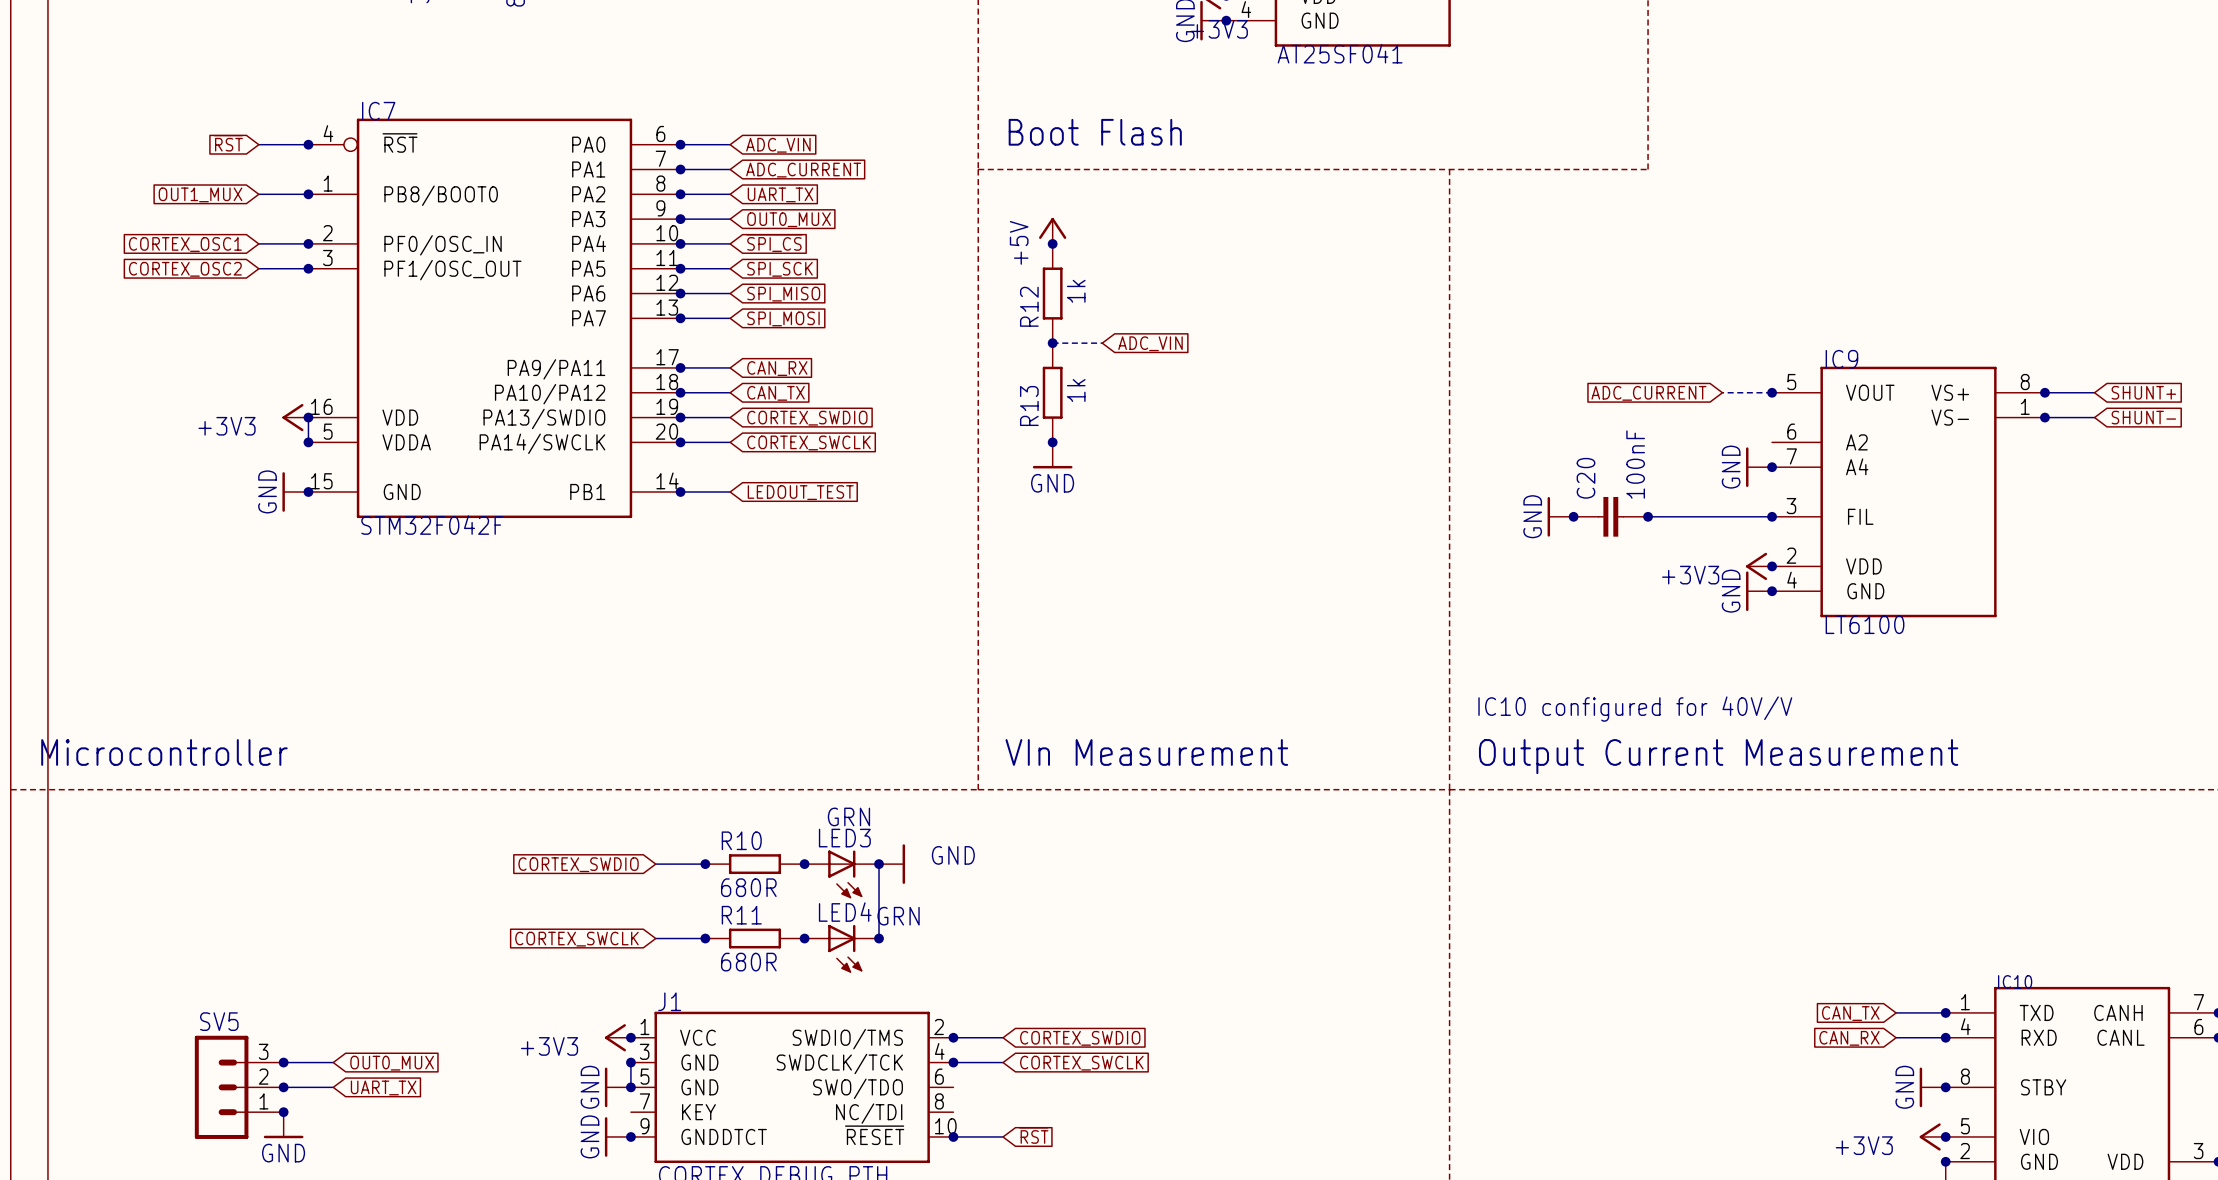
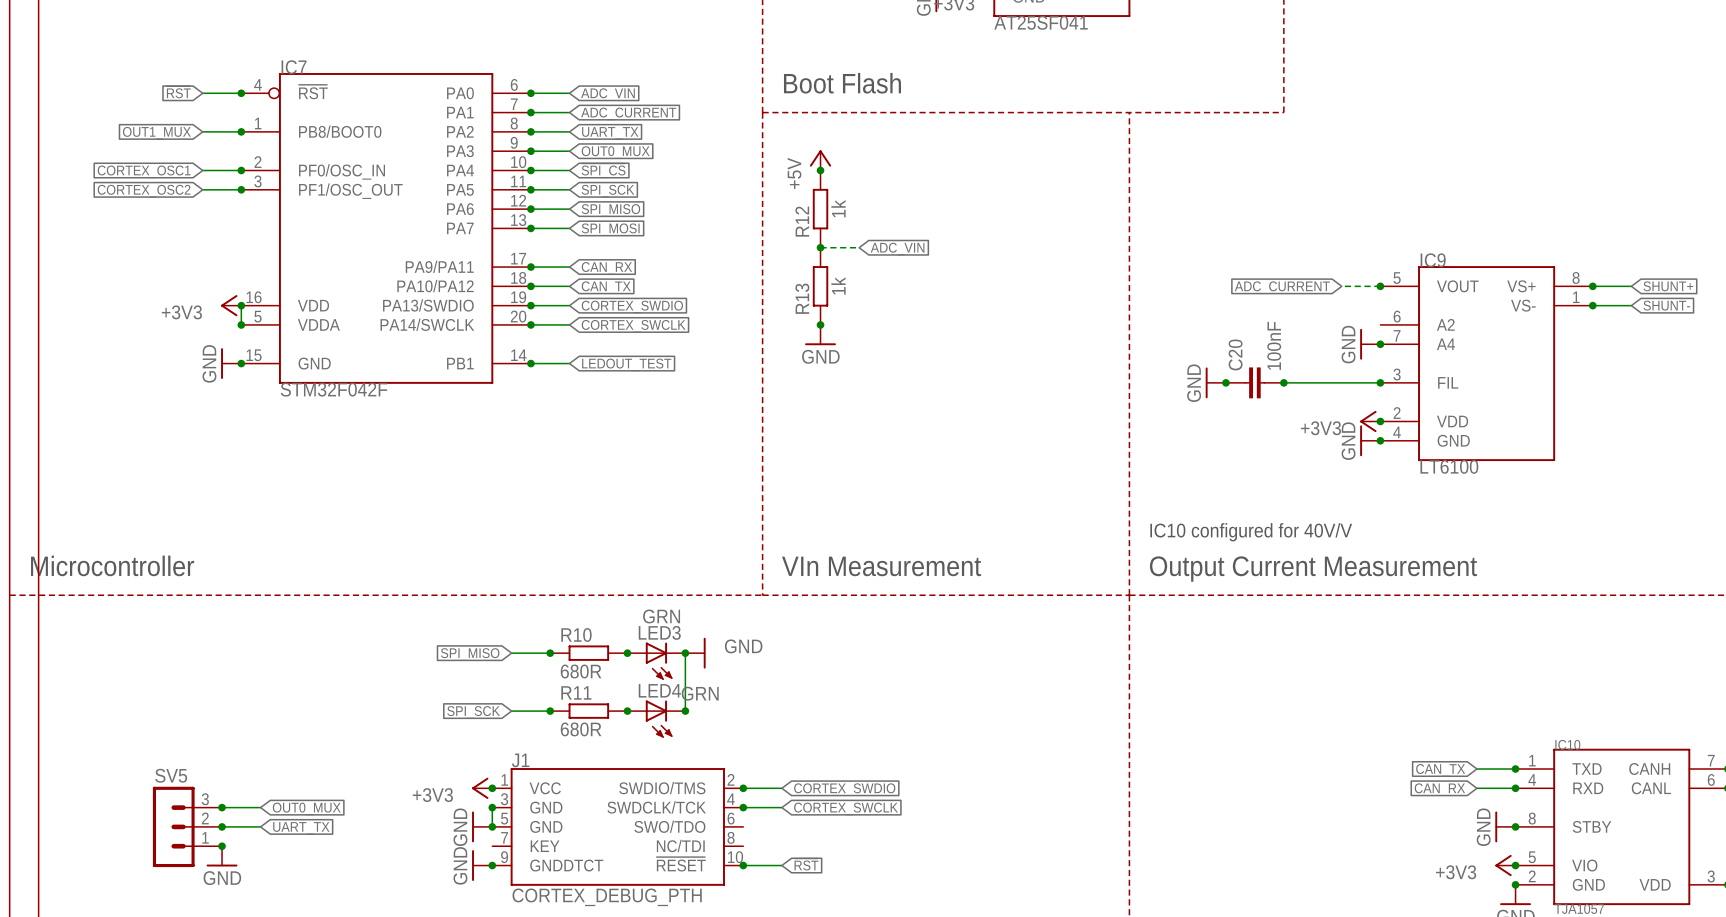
global label: CORTEX_SWDIO (578, 864) -> SPI_MISO (470, 654)
global label: CORTEX_SWCLK (576, 939) -> SPI_SCK (473, 712)

